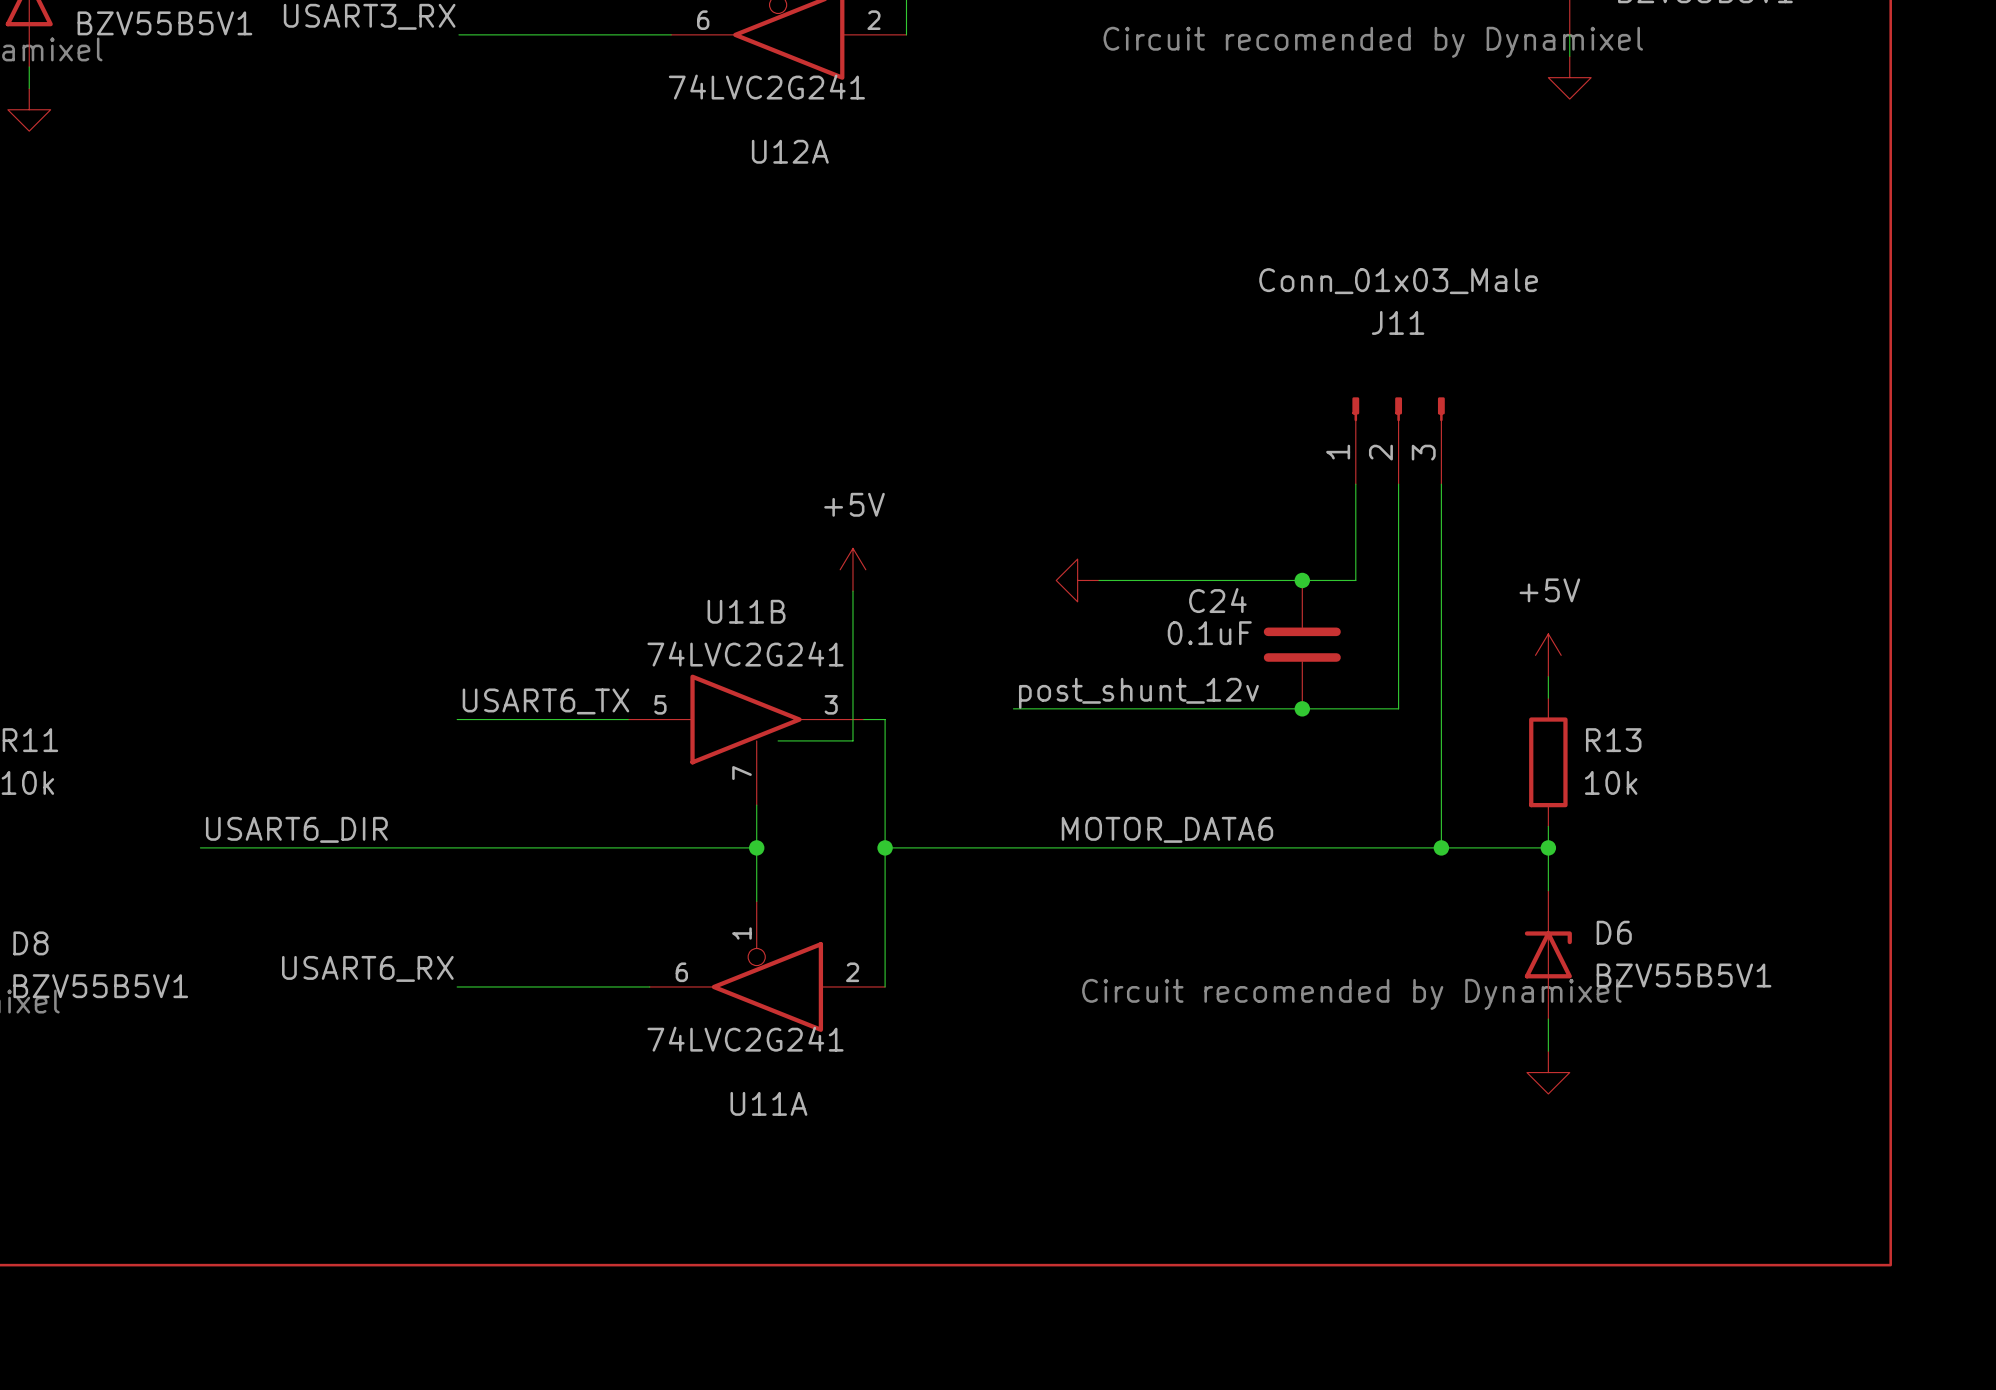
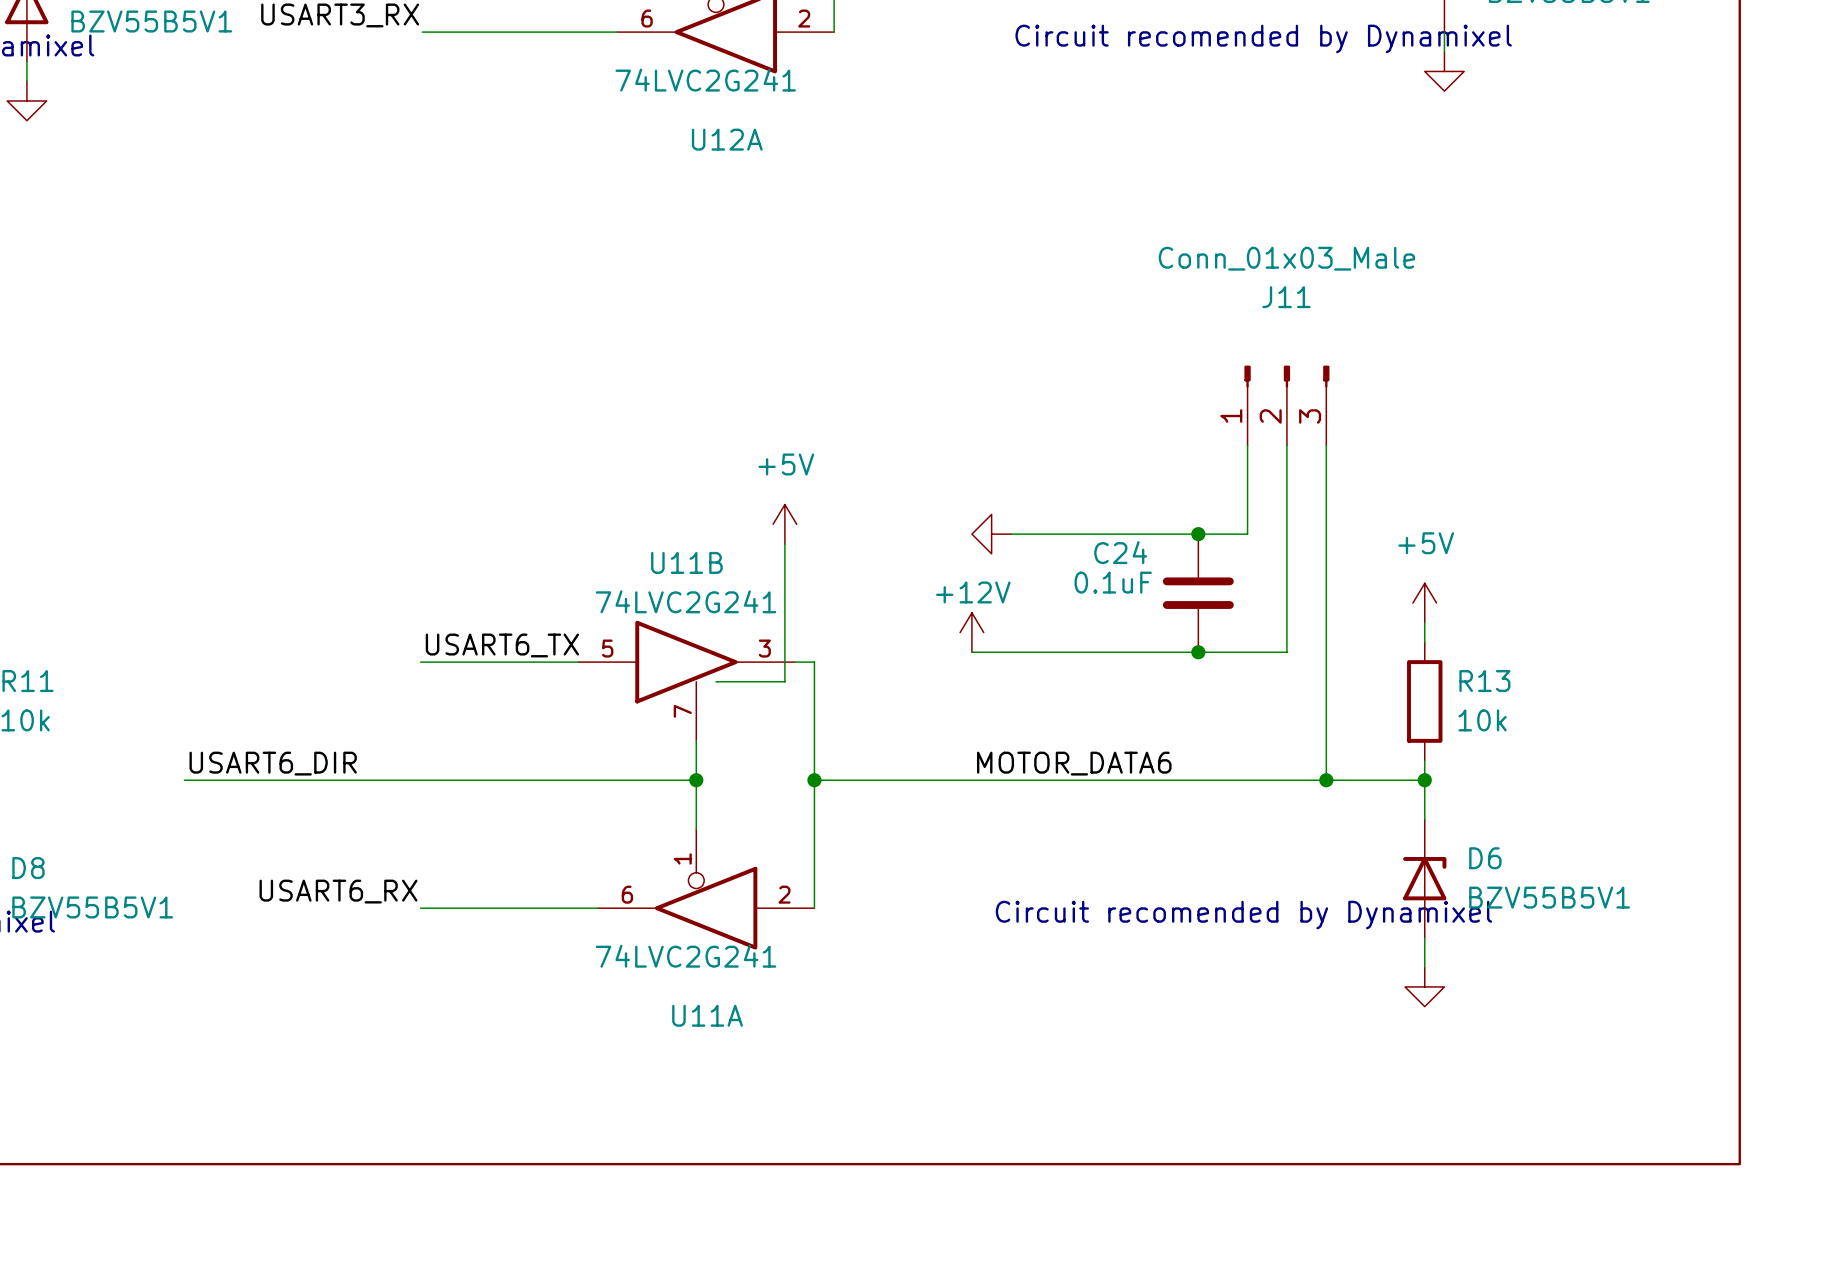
power symbol: none -> +12V (971, 632)
label: post_shunt_12v (1138, 693) -> none
wire: (1013, 708) (1056, 708) -> none

